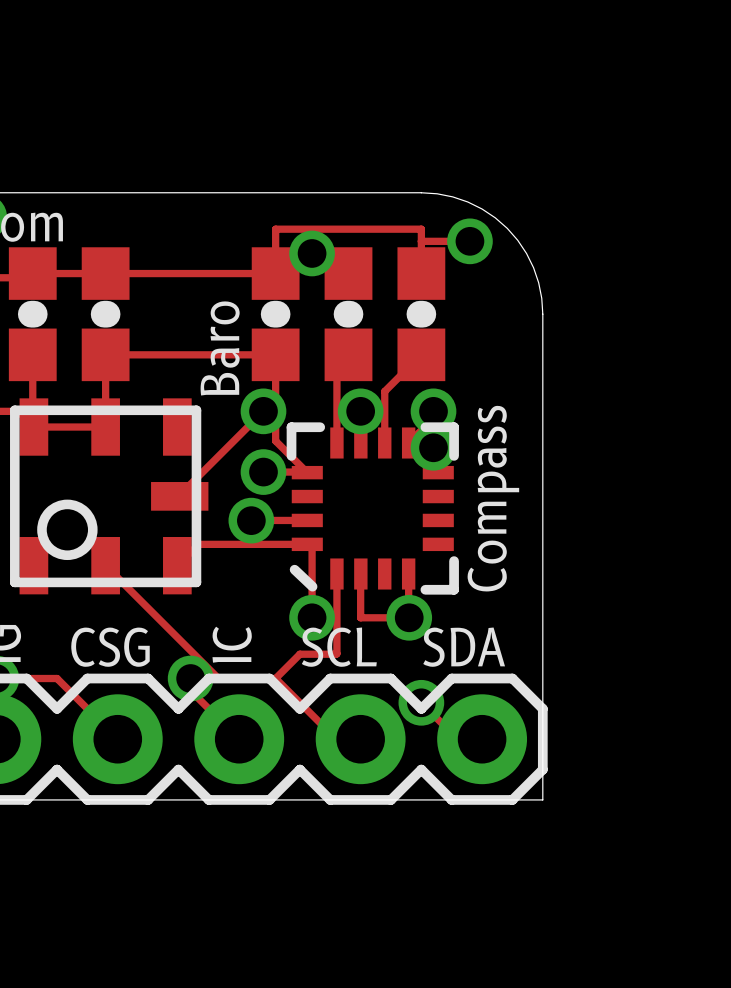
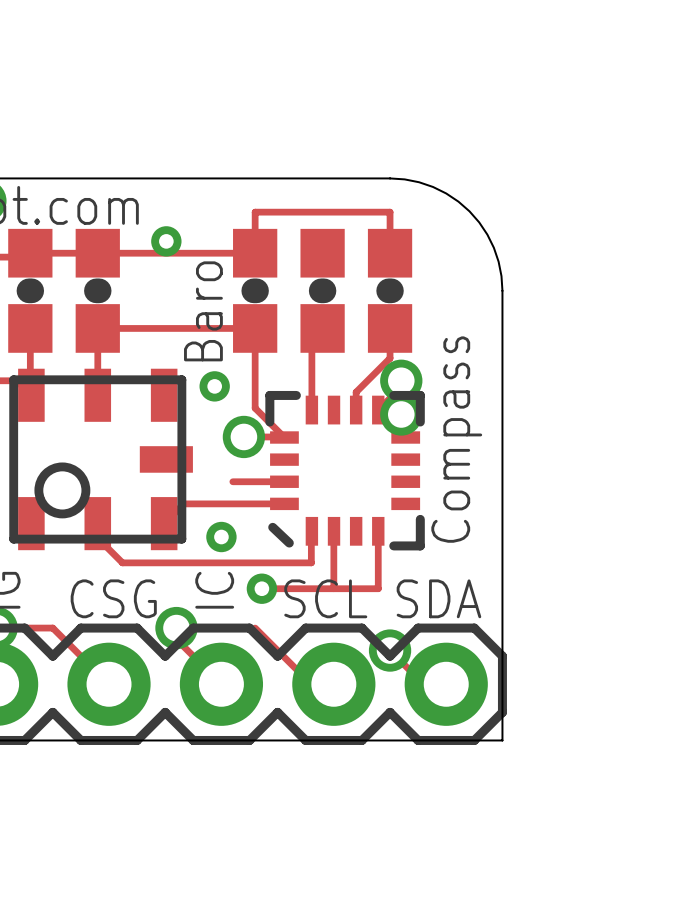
track: (421, 241) (469, 241) -> none
via: (469, 241) -> none
via: (312, 253) -> none
via: none -> (166, 241)
track: (421, 354) (384, 391) (384, 423) -> (390, 328) (390, 358) (356, 392)
track: (263, 411) (179, 496) -> none
via position: (263, 411) -> (214, 386)
via: (360, 411) -> none
track: (33, 427) (105, 427) -> none
via: (251, 520) -> none
track: (307, 544) (312, 549) (312, 617) -> none
track: (105, 565) (218, 678) (275, 678) (299, 654) (336, 654) -> (97, 523) (97, 538) (122, 562) (311, 562) (311, 531)
track: (336, 573) (336, 653) -> none
via: none -> (221, 537)
via position: (312, 617) -> (261, 588)
track: (360, 617) (409, 617) -> (333, 571) (333, 588)
track: none -> (378, 571) (378, 588) (261, 588)
via: (409, 617) -> none

